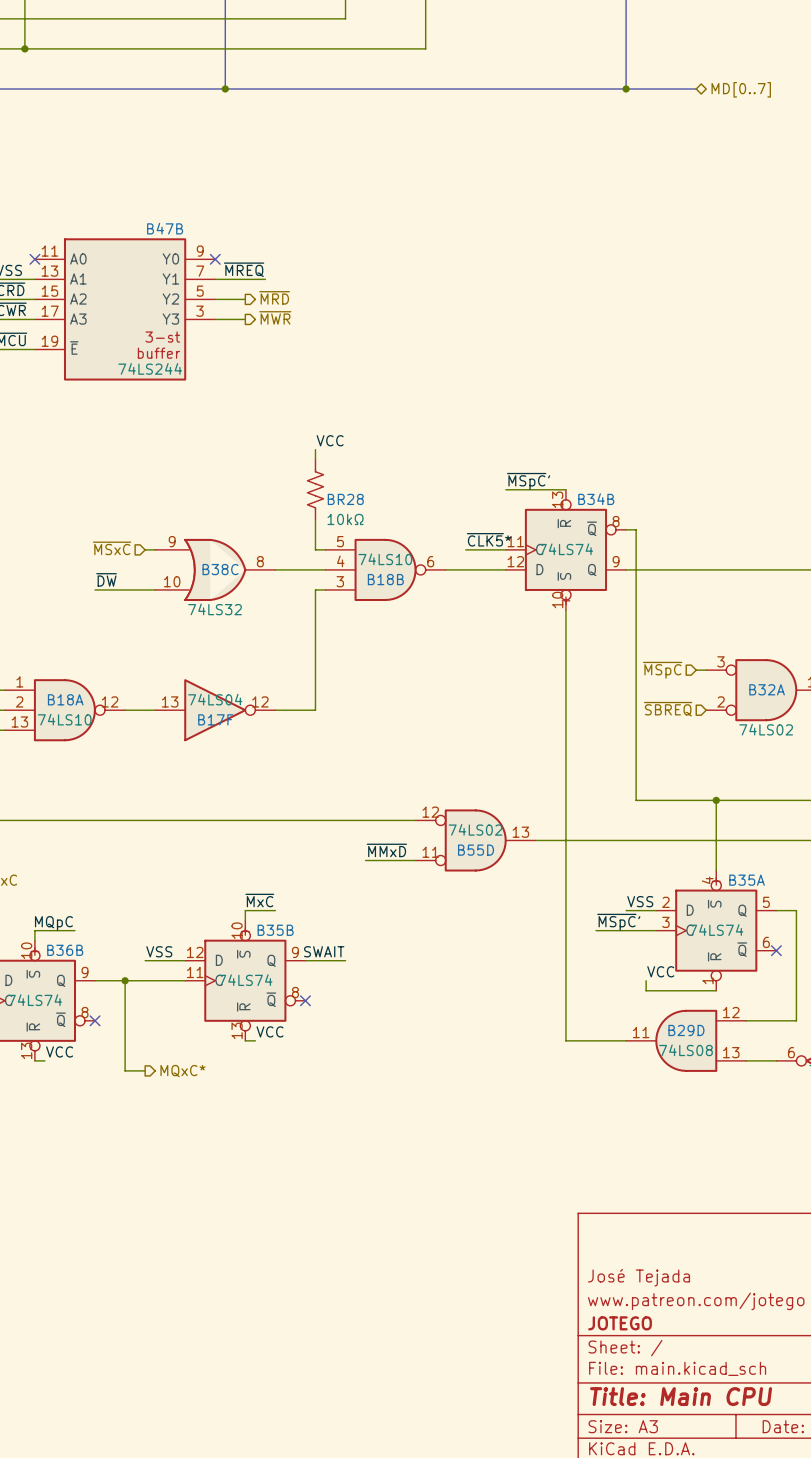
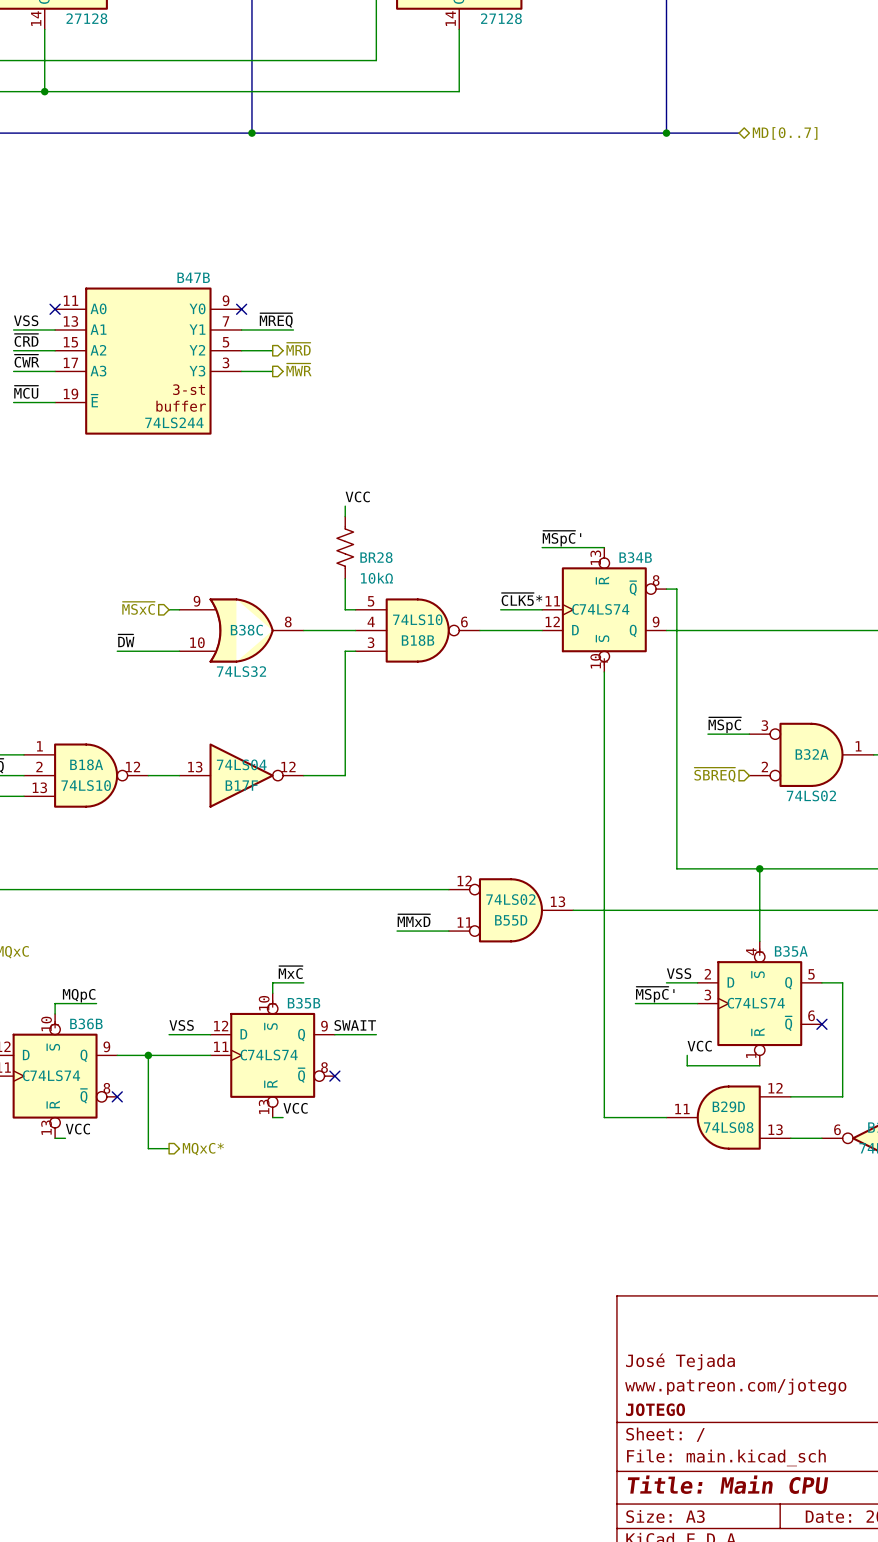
label: none -> ~{MSpC} (724, 725)
hierarchical label: ~{MSpC} (662, 670) -> none
wire: none -> (707, 734) (739, 734)

